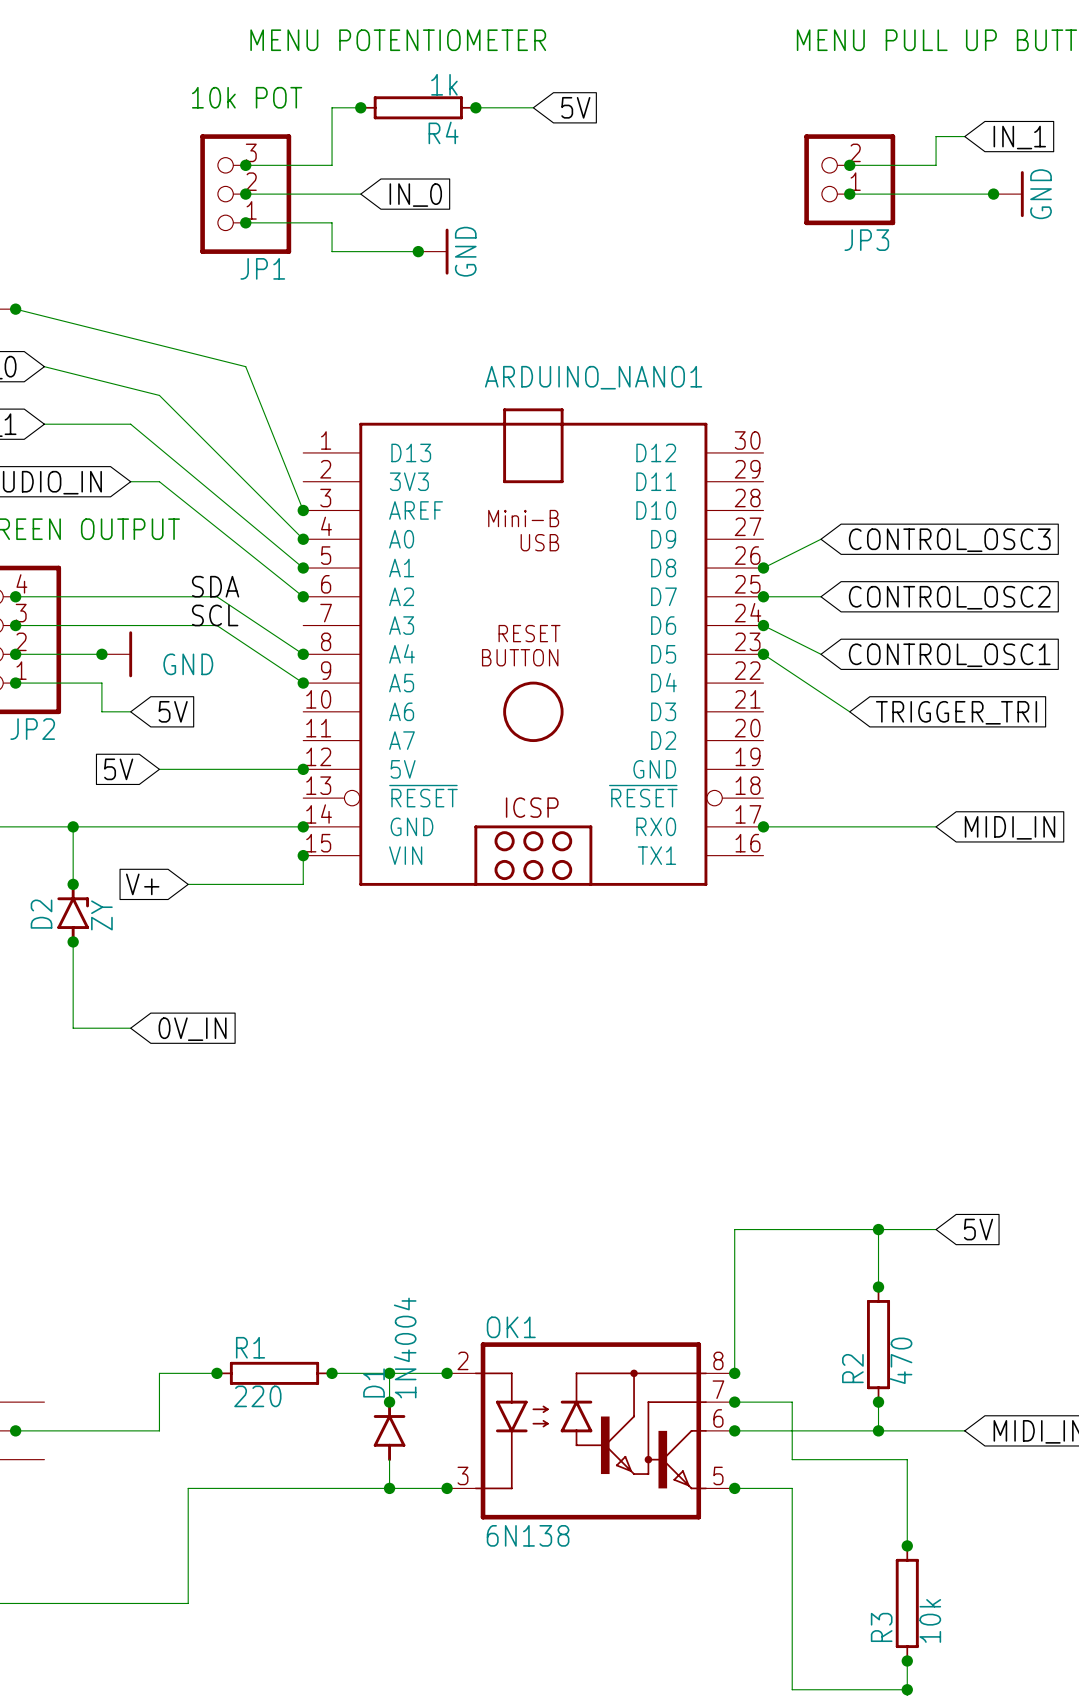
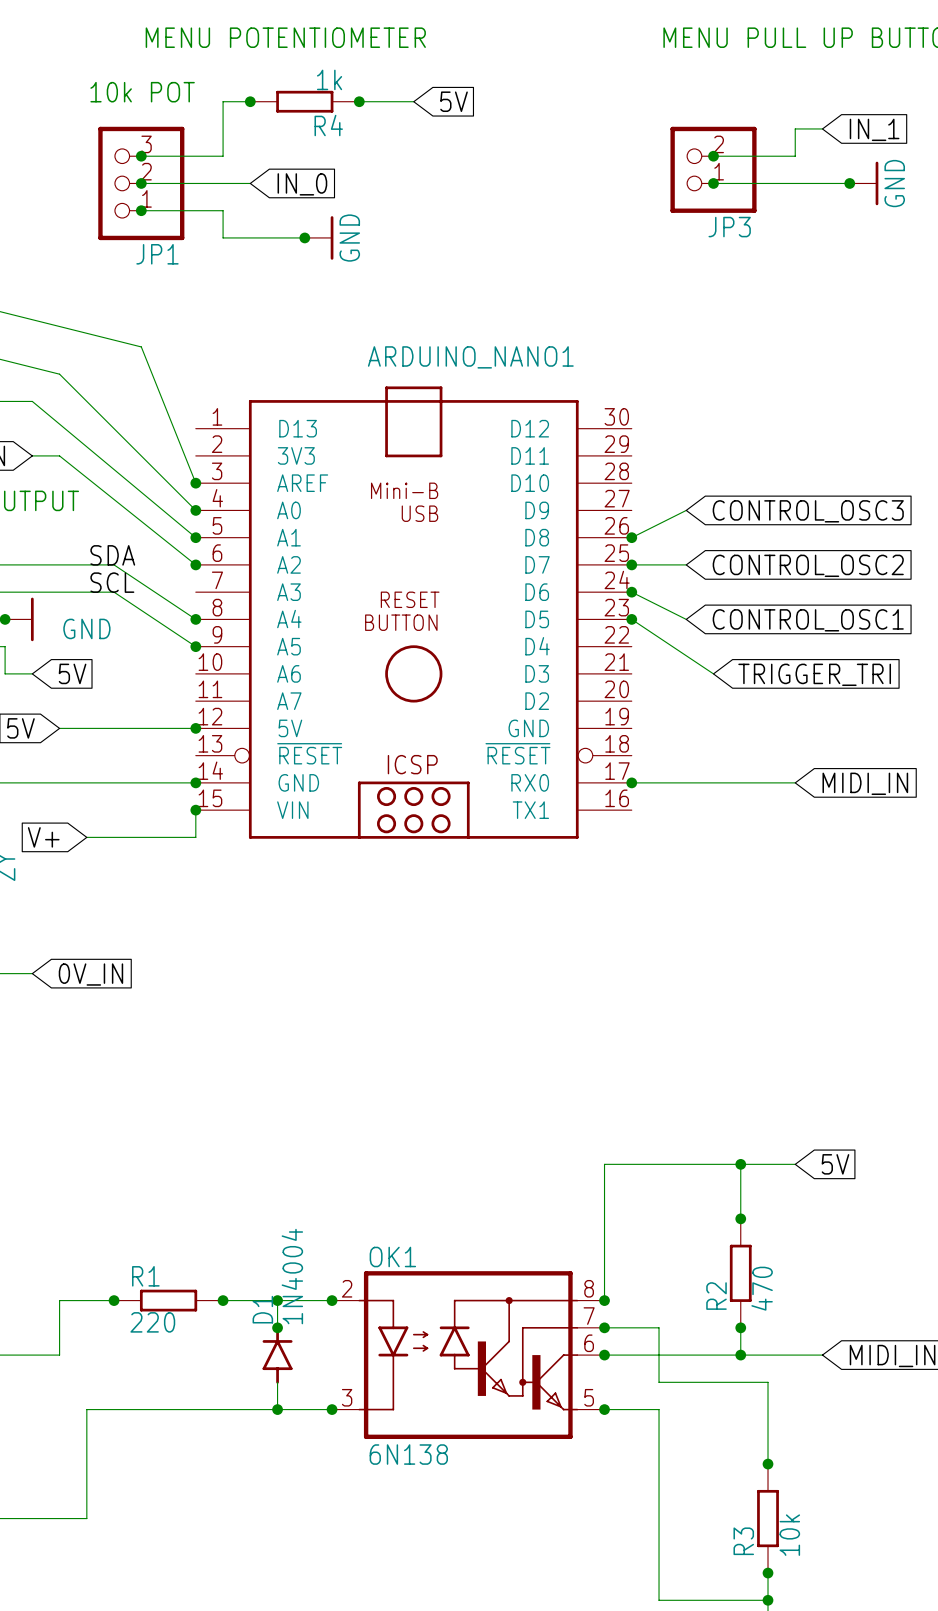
R4 symbol: [359, 96, 477, 120] -> [250, 90, 360, 113]
R2 symbol: [867, 1286, 891, 1403] -> [729, 1218, 752, 1328]
R1 symbol: [216, 1361, 333, 1385] -> [114, 1289, 224, 1312]
R3 symbol: [895, 1545, 919, 1662] -> [757, 1464, 779, 1574]

